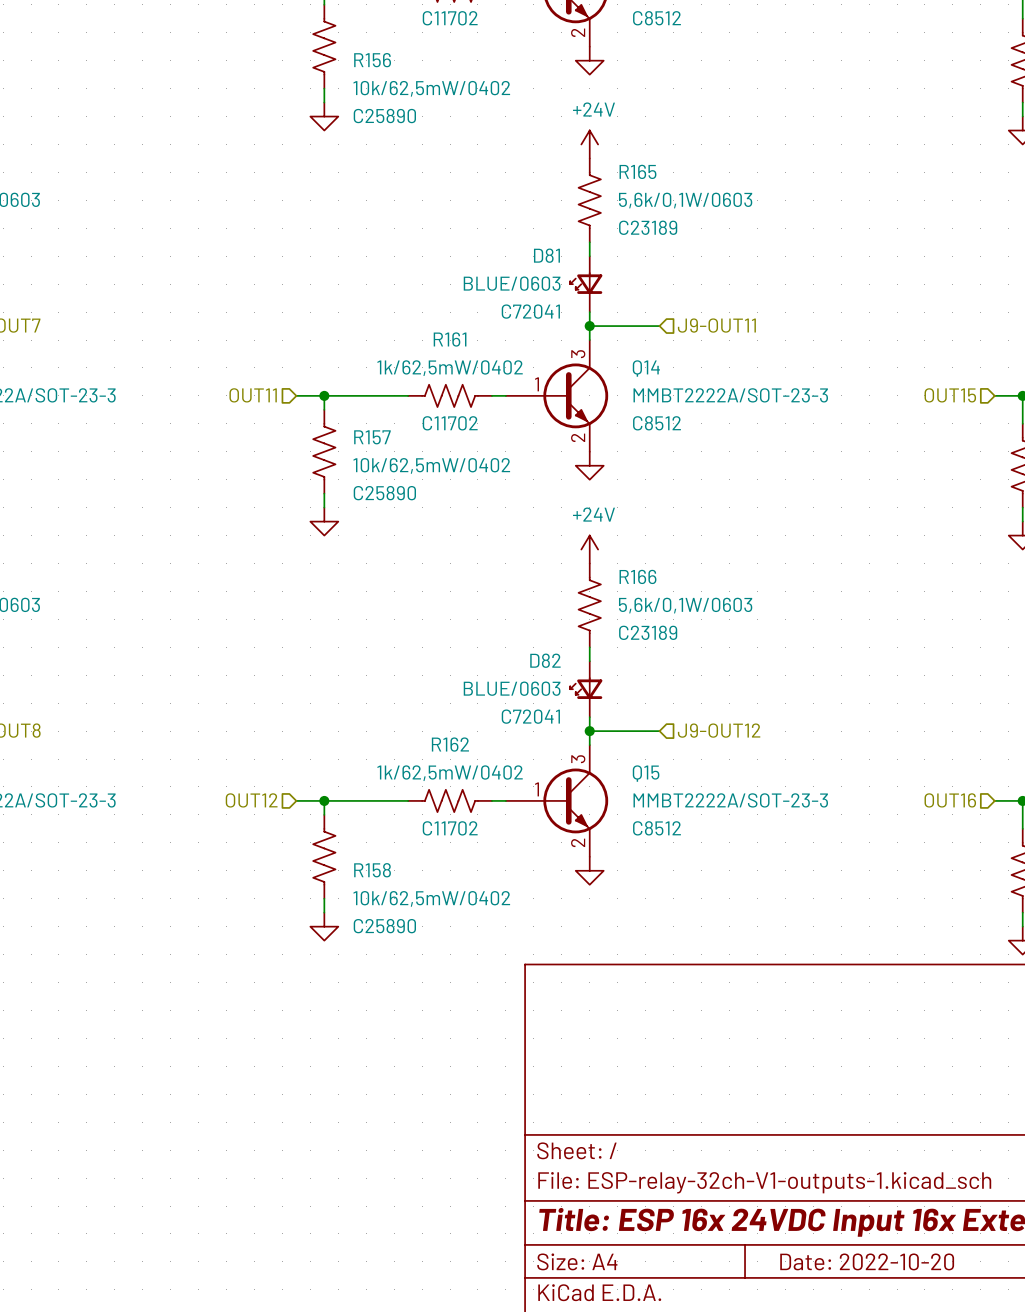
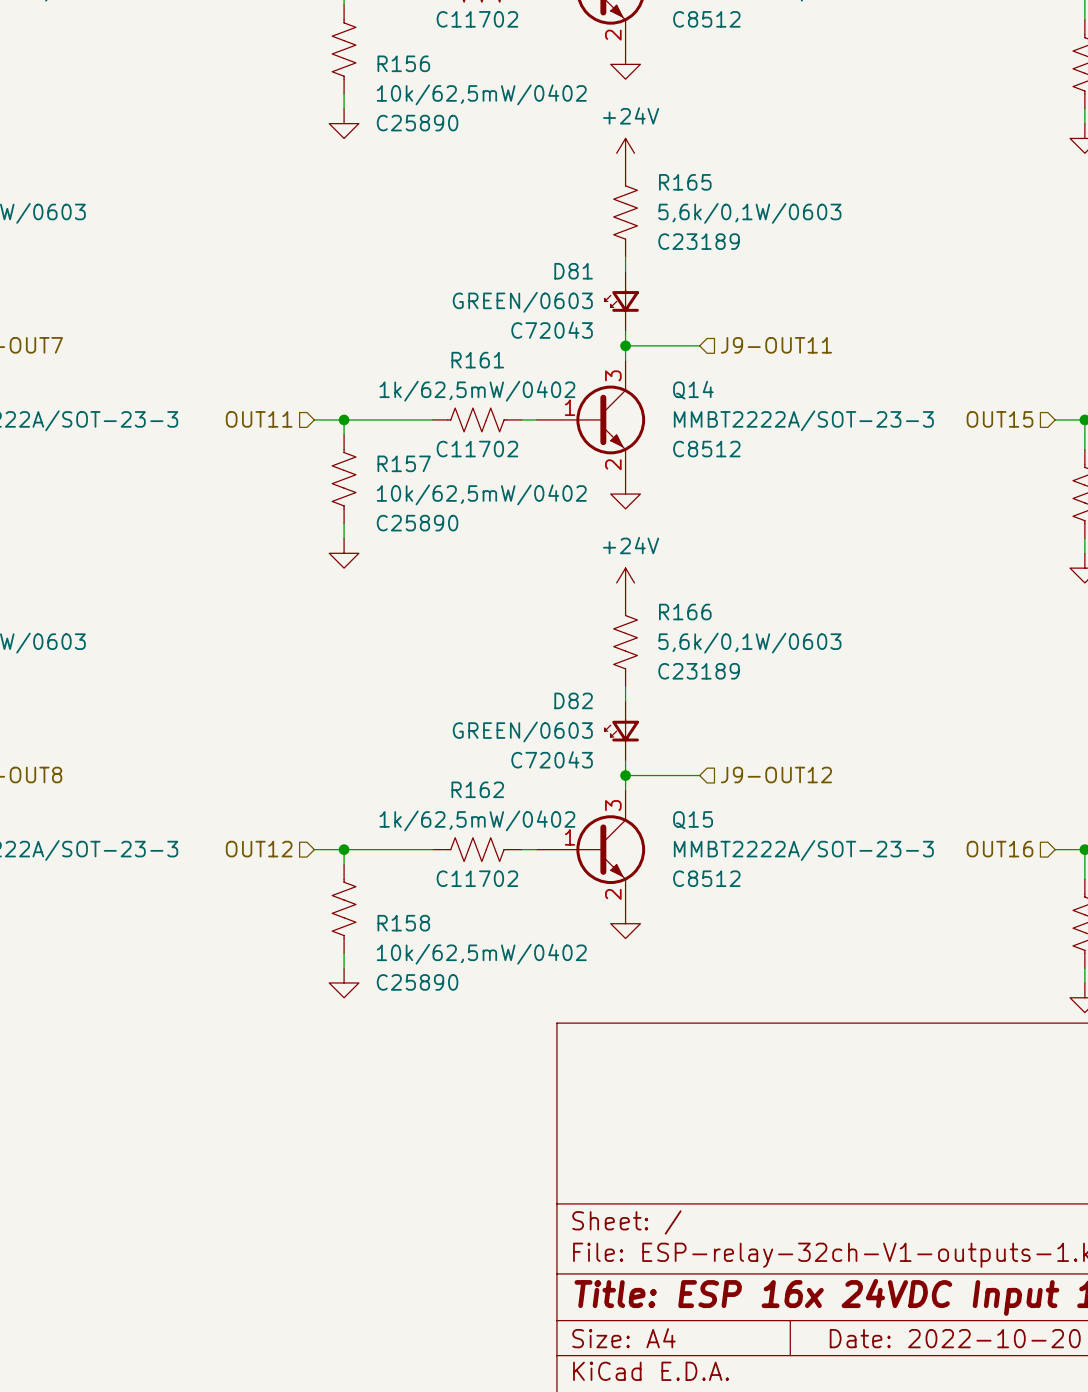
D81 value: BLUE/0603 (512, 283) -> GREEN/0603 (522, 302)
D81 text: C72041 (530, 311) -> C72043 (552, 330)
D82 value: BLUE/0603 (512, 688) -> GREEN/0603 (522, 731)
D82 text: C72041 (530, 716) -> C72043 (552, 759)

